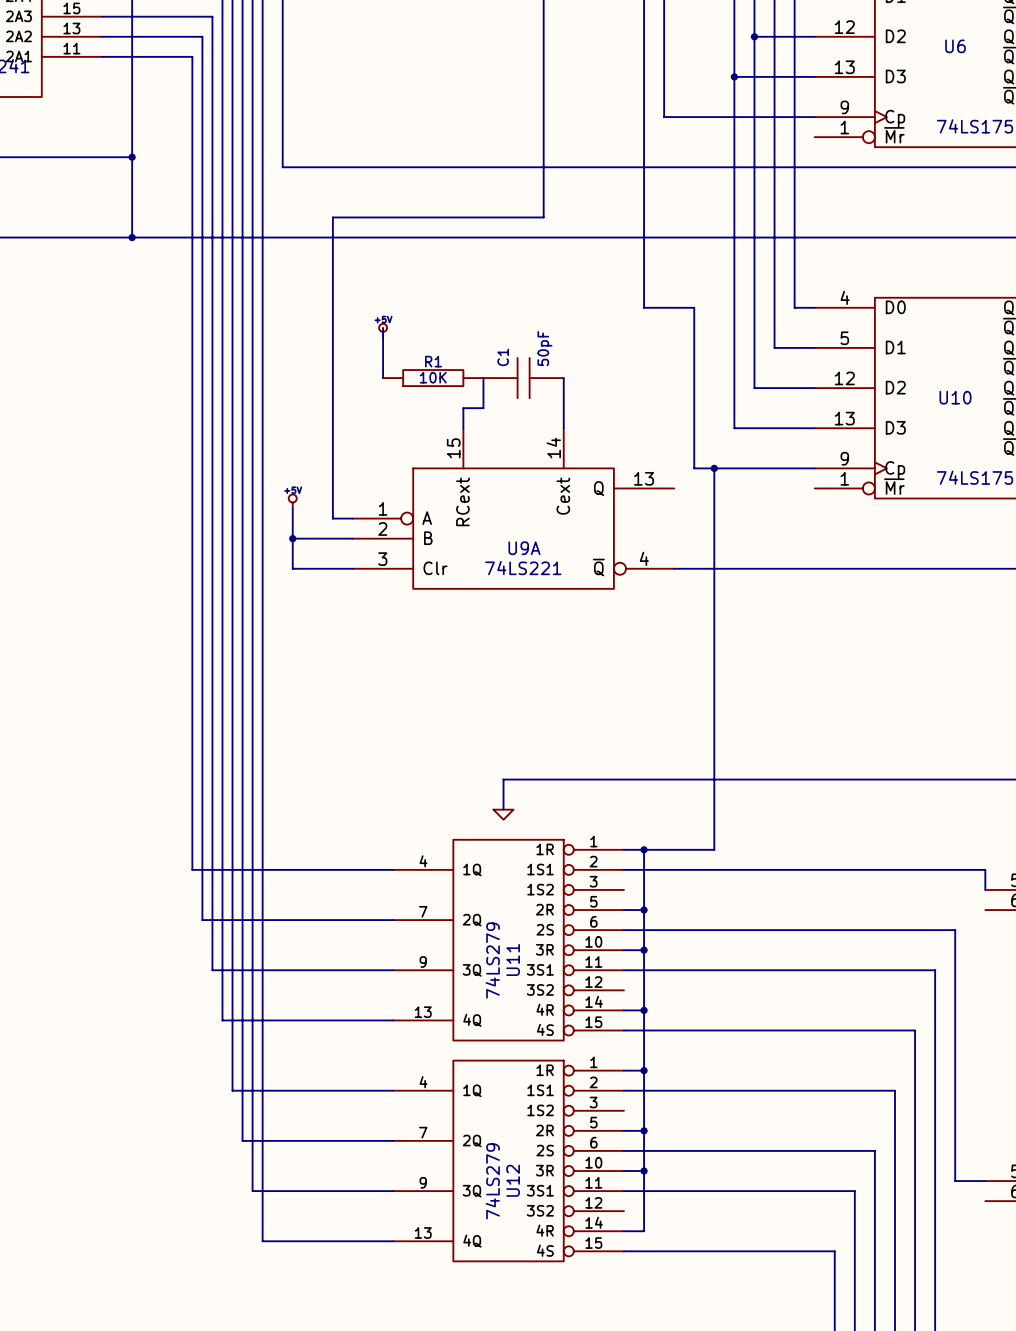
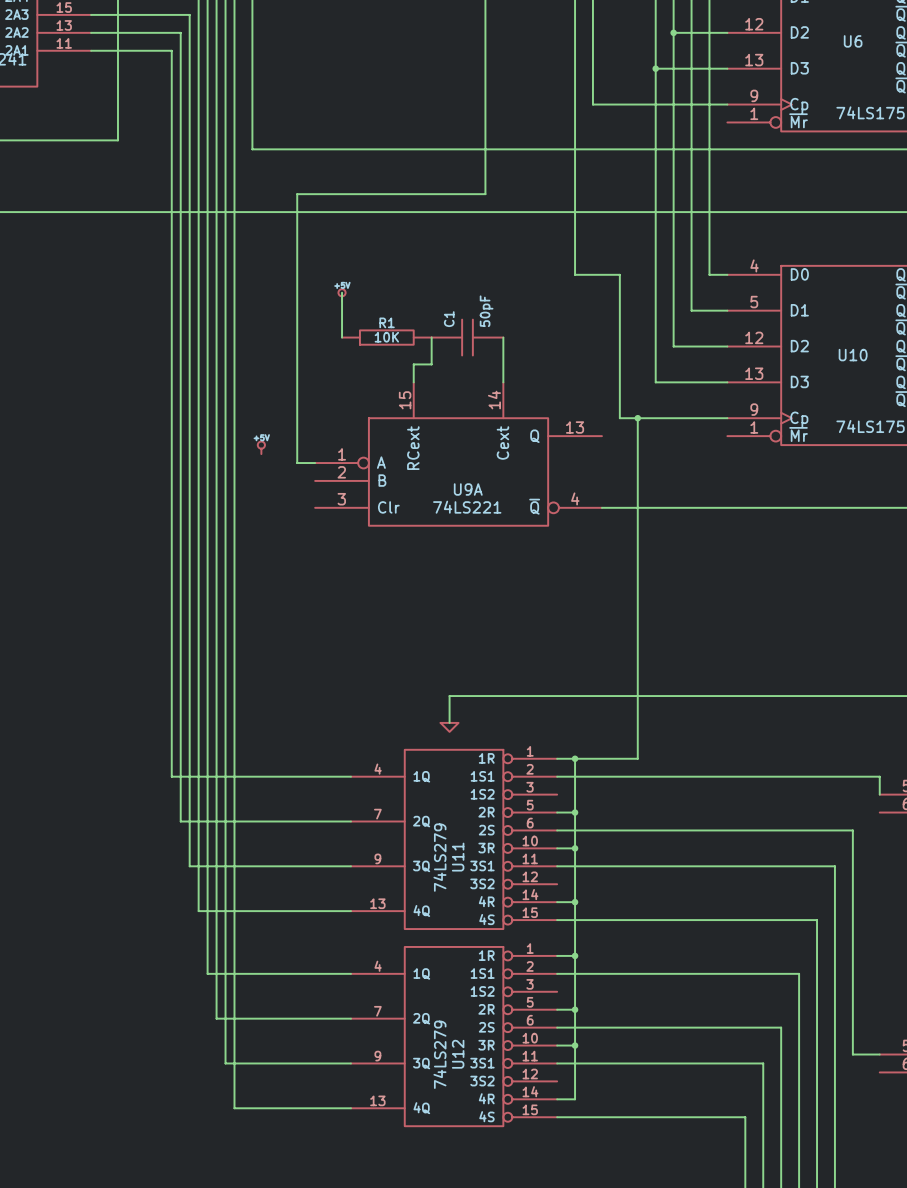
wire: (132, 157) (132, 237) -> none
junction: (132, 157) -> none
junction: (132, 237) -> none
wire: (292, 508) (292, 568) (352, 568) -> none
wire: (292, 538) (352, 538) -> none
junction: (292, 538) -> none

